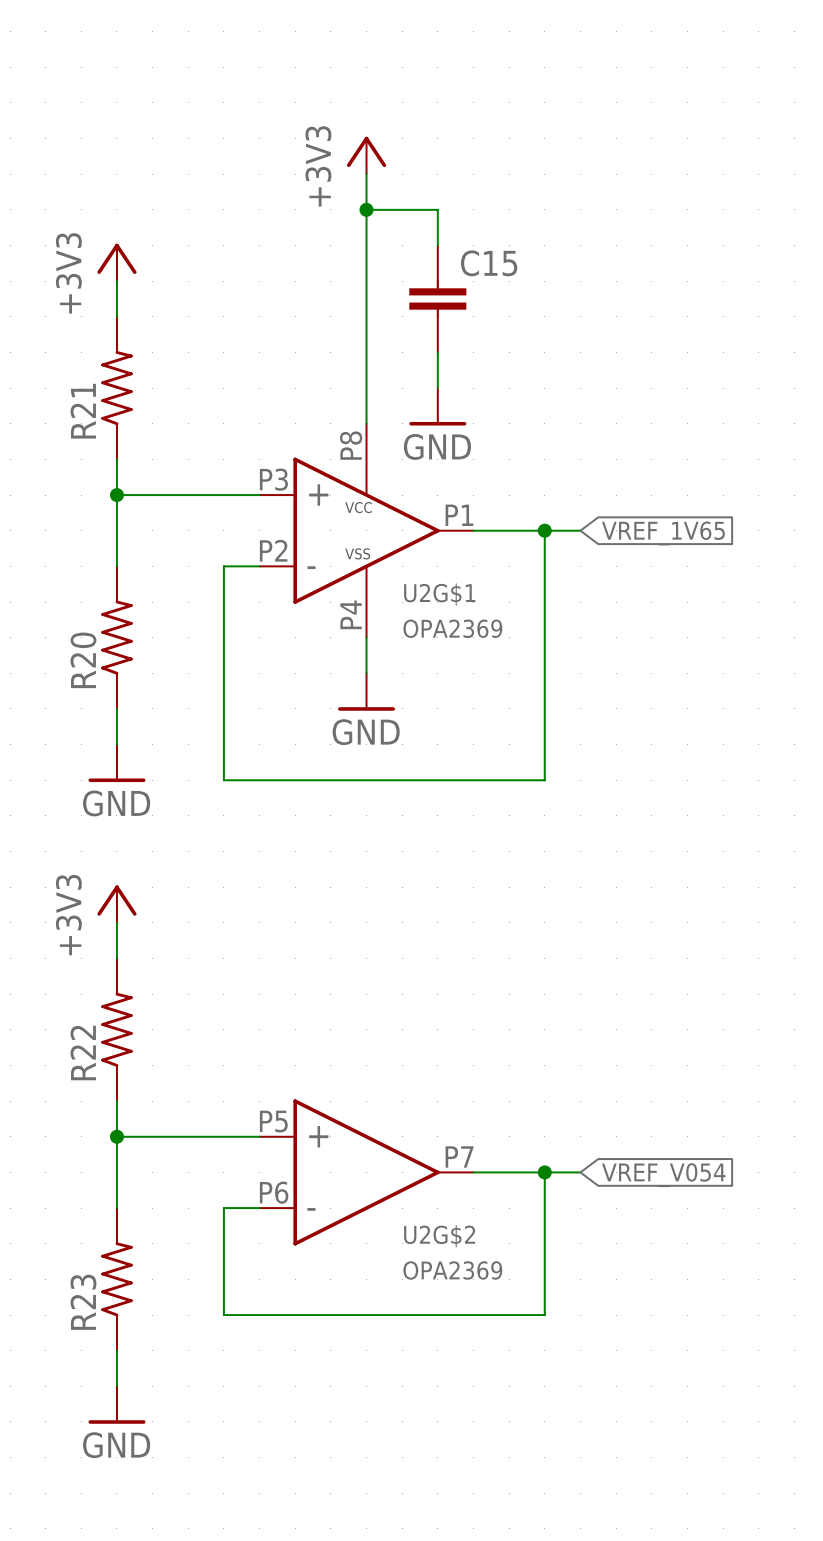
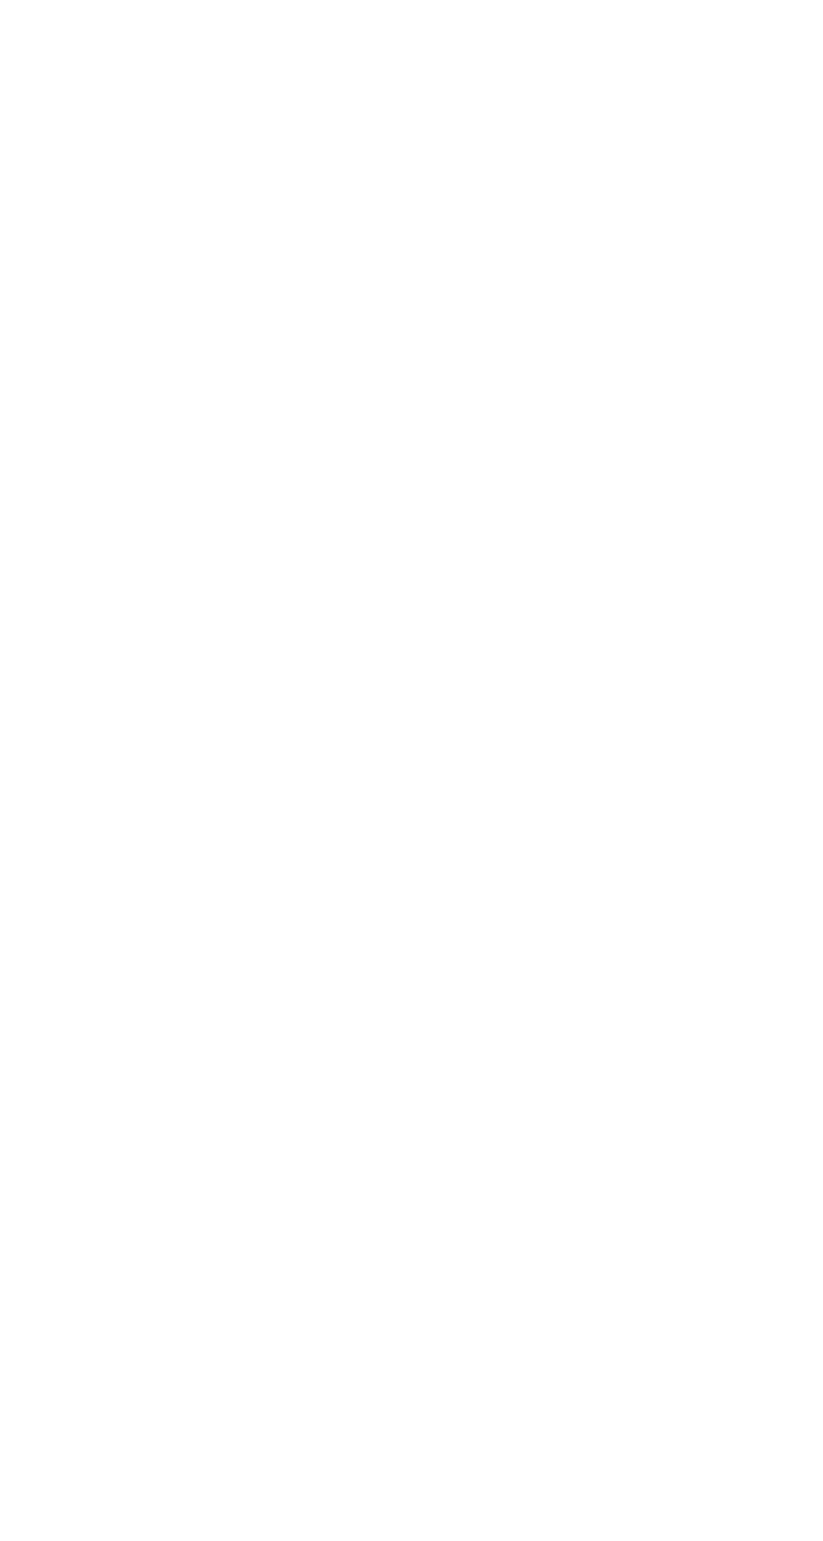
power symbol: +3V3 (366, 155) -> none
wire: (366, 174) (366, 423) -> none
wire: (366, 209) (437, 209) (437, 245) -> none
junction: (366, 209) -> none
power symbol: +3V3 (116, 262) -> none
wire: (116, 281) (116, 316) -> none
C15: (437, 298) -> none
wire: (437, 352) (437, 388) -> none
R21: (116, 388) -> none
power symbol: GND (437, 406) -> none
wire: (116, 459) (116, 566) -> none
wire: (116, 495) (259, 495) -> none
junction: (116, 495) -> none
U2G$1: OPA2369 (366, 530) -> none
wire: (473, 530) (580, 530) -> none
wire: (544, 530) (544, 780) (223, 780) (223, 566) (259, 566) -> none
junction: (544, 530) -> none
global label: VREF_1V65 (663, 533) -> none
R20: (116, 637) -> none
wire: (366, 637) (366, 673) -> none
power symbol: GND (366, 692) -> none
wire: (116, 708) (116, 744) -> none
power symbol: GND (116, 763) -> none
power symbol: +3V3 (116, 904) -> none
wire: (116, 922) (116, 958) -> none
R22: (116, 1029) -> none
wire: (116, 1101) (116, 1208) -> none
wire: (116, 1136) (259, 1136) -> none
junction: (116, 1136) -> none
U2G$2: OPA2369 (366, 1172) -> none
wire: (473, 1172) (580, 1172) -> none
wire: (544, 1172) (544, 1315) (223, 1315) (223, 1208) (259, 1208) -> none
junction: (544, 1172) -> none
global label: VREF_V054 (663, 1175) -> none
R23: (116, 1279) -> none
wire: (116, 1350) (116, 1386) -> none
power symbol: GND (116, 1405) -> none

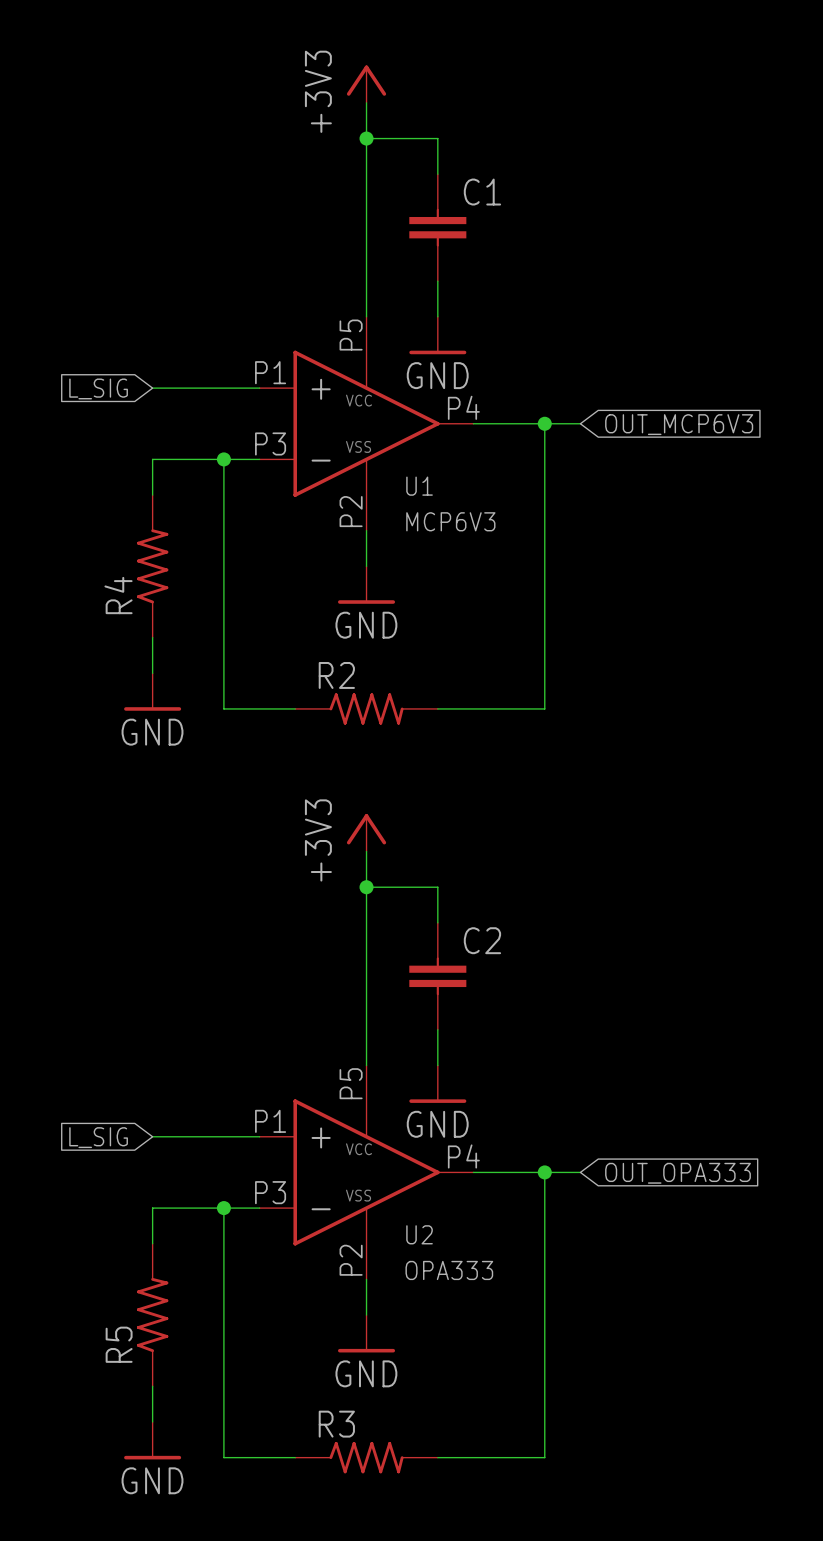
power symbol: none -> +3V3 (366, 84)
wire: none -> (366, 102) (366, 316)
wire: none -> (366, 138) (437, 138) (437, 174)
junction: none -> (366, 138)
C1: none -> (437, 227)
wire: none -> (437, 281) (437, 316)
power symbol: none -> GND (437, 335)
global label: none -> L_SIG (98, 388)
wire: none -> (152, 388) (259, 388)
U1: none -> MCP6V3 (366, 423)
wire: none -> (473, 423) (580, 423)
wire: none -> (544, 423) (544, 708) (437, 708)
junction: none -> (544, 423)
global label: none -> OUT_MCP6V3 (679, 424)
wire: none -> (223, 459) (223, 708) (295, 708)
junction: none -> (223, 459)
wire: none -> (259, 459) (152, 459) (152, 495)
wire: none -> (366, 530) (366, 566)
R4: none -> (152, 566)
power symbol: none -> GND (366, 585)
wire: none -> (152, 637) (152, 673)
power symbol: none -> GND (152, 692)
R2: none -> (366, 708)
power symbol: none -> +3V3 (366, 832)
wire: none -> (366, 851) (366, 1065)
wire: none -> (366, 887) (437, 887) (437, 922)
junction: none -> (366, 887)
C2: none -> (437, 976)
wire: none -> (437, 1029) (437, 1065)
power symbol: none -> GND (437, 1084)
wire: none -> (152, 1136) (259, 1136)
global label: none -> L_SIG (98, 1137)
U2: none -> OPA333 (366, 1172)
wire: none -> (473, 1172) (580, 1172)
wire: none -> (544, 1172) (544, 1457) (437, 1457)
junction: none -> (544, 1172)
global label: none -> OUT_OPA333 (678, 1173)
wire: none -> (223, 1208) (223, 1457) (295, 1457)
junction: none -> (223, 1208)
wire: none -> (259, 1208) (152, 1208) (152, 1243)
wire: none -> (366, 1279) (366, 1315)
R5: none -> (152, 1315)
power symbol: none -> GND (366, 1333)
wire: none -> (152, 1386) (152, 1421)
power symbol: none -> GND (152, 1440)
R3: none -> (366, 1457)

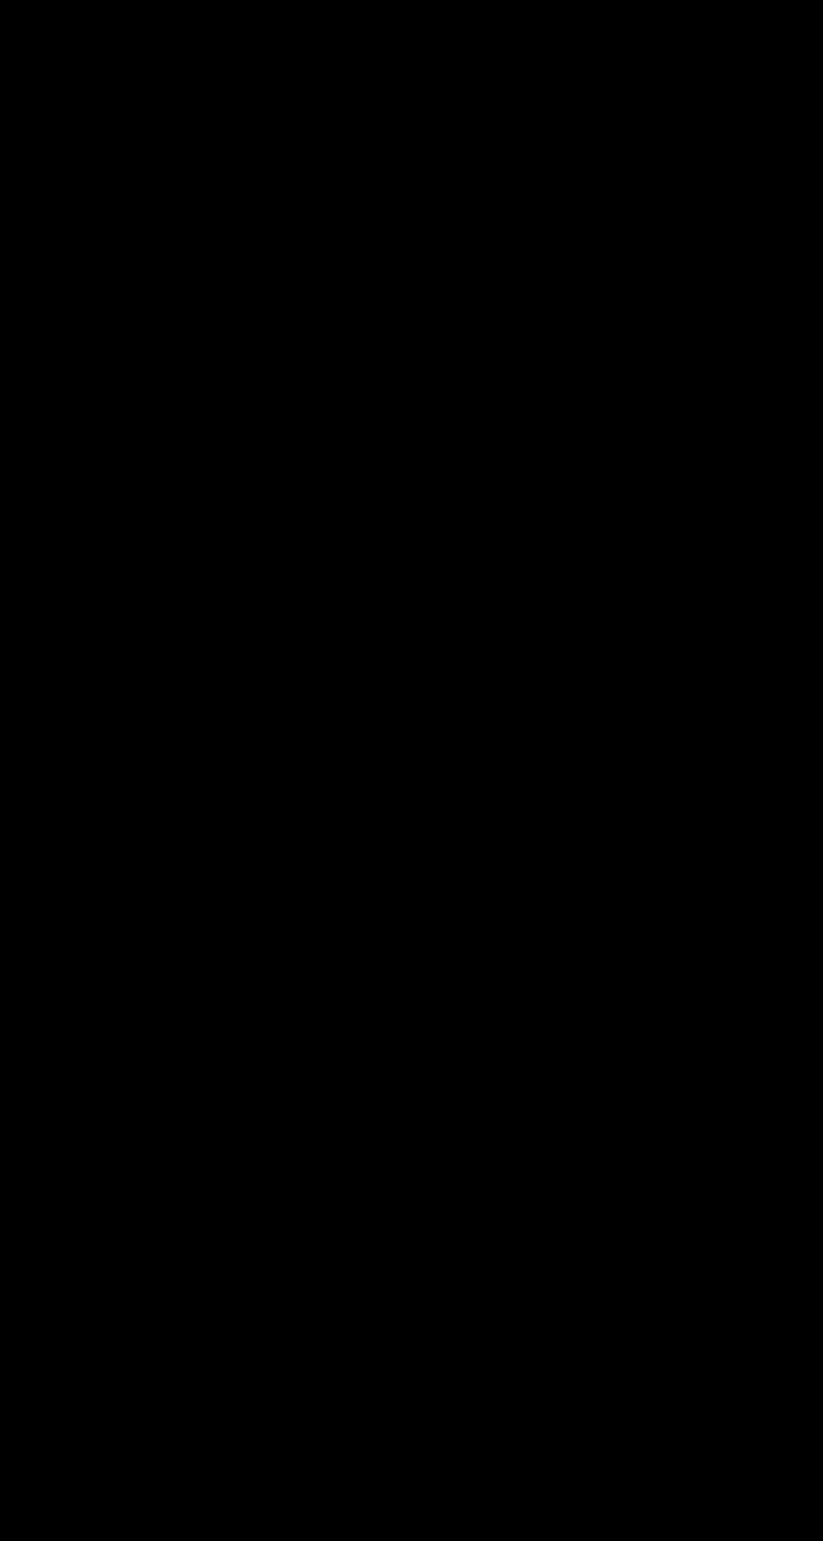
power symbol: +3V3 (366, 84) -> none
wire: (366, 102) (366, 316) -> none
wire: (366, 138) (437, 138) (437, 174) -> none
junction: (366, 138) -> none
C1: (437, 227) -> none
wire: (437, 281) (437, 316) -> none
power symbol: GND (437, 335) -> none
global label: L_SIG (98, 388) -> none
wire: (152, 388) (259, 388) -> none
U1: MCP6V3 (366, 423) -> none
wire: (473, 423) (580, 423) -> none
wire: (544, 423) (544, 708) (437, 708) -> none
junction: (544, 423) -> none
global label: OUT_MCP6V3 (679, 424) -> none
wire: (223, 459) (223, 708) (295, 708) -> none
junction: (223, 459) -> none
wire: (259, 459) (152, 459) (152, 495) -> none
wire: (366, 530) (366, 566) -> none
R4: (152, 566) -> none
power symbol: GND (366, 585) -> none
wire: (152, 637) (152, 673) -> none
power symbol: GND (152, 692) -> none
R2: (366, 708) -> none
power symbol: +3V3 (366, 832) -> none
wire: (366, 851) (366, 1065) -> none
wire: (366, 887) (437, 887) (437, 922) -> none
junction: (366, 887) -> none
C2: (437, 976) -> none
wire: (437, 1029) (437, 1065) -> none
power symbol: GND (437, 1084) -> none
wire: (152, 1136) (259, 1136) -> none
global label: L_SIG (98, 1137) -> none
U2: OPA333 (366, 1172) -> none
wire: (473, 1172) (580, 1172) -> none
wire: (544, 1172) (544, 1457) (437, 1457) -> none
junction: (544, 1172) -> none
global label: OUT_OPA333 (678, 1173) -> none
wire: (223, 1208) (223, 1457) (295, 1457) -> none
junction: (223, 1208) -> none
wire: (259, 1208) (152, 1208) (152, 1243) -> none
wire: (366, 1279) (366, 1315) -> none
R5: (152, 1315) -> none
power symbol: GND (366, 1333) -> none
wire: (152, 1386) (152, 1421) -> none
power symbol: GND (152, 1440) -> none
R3: (366, 1457) -> none

